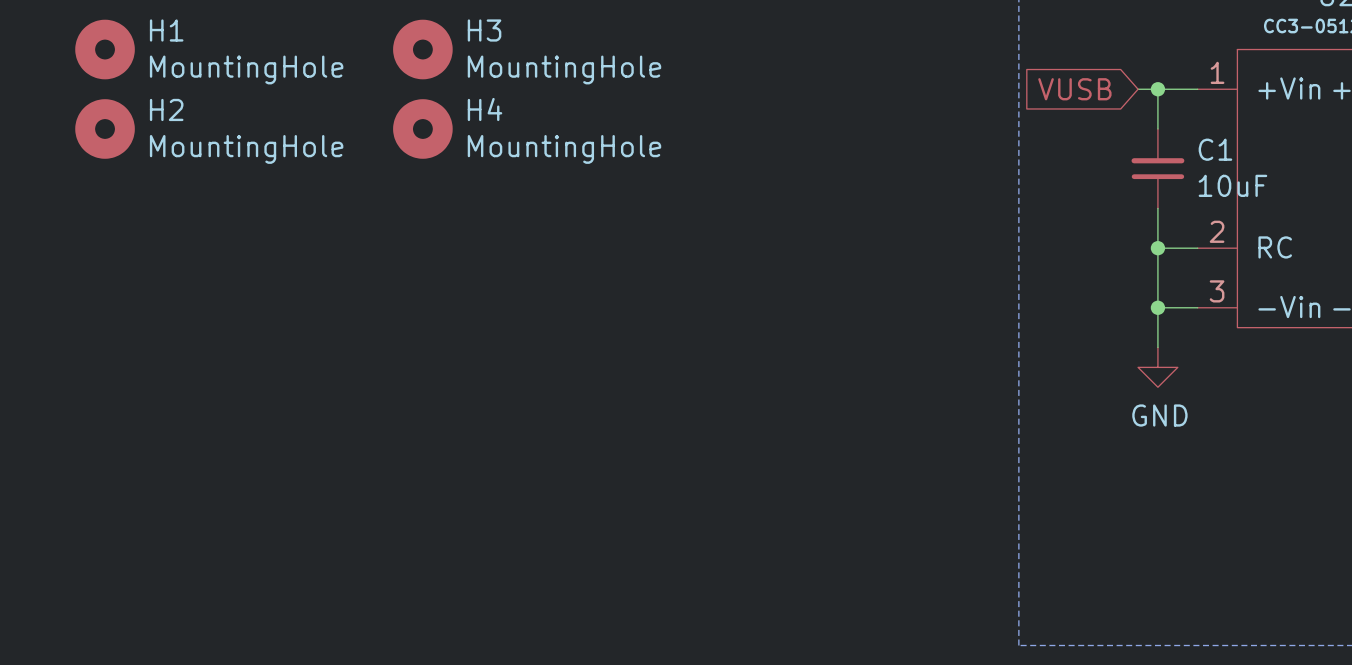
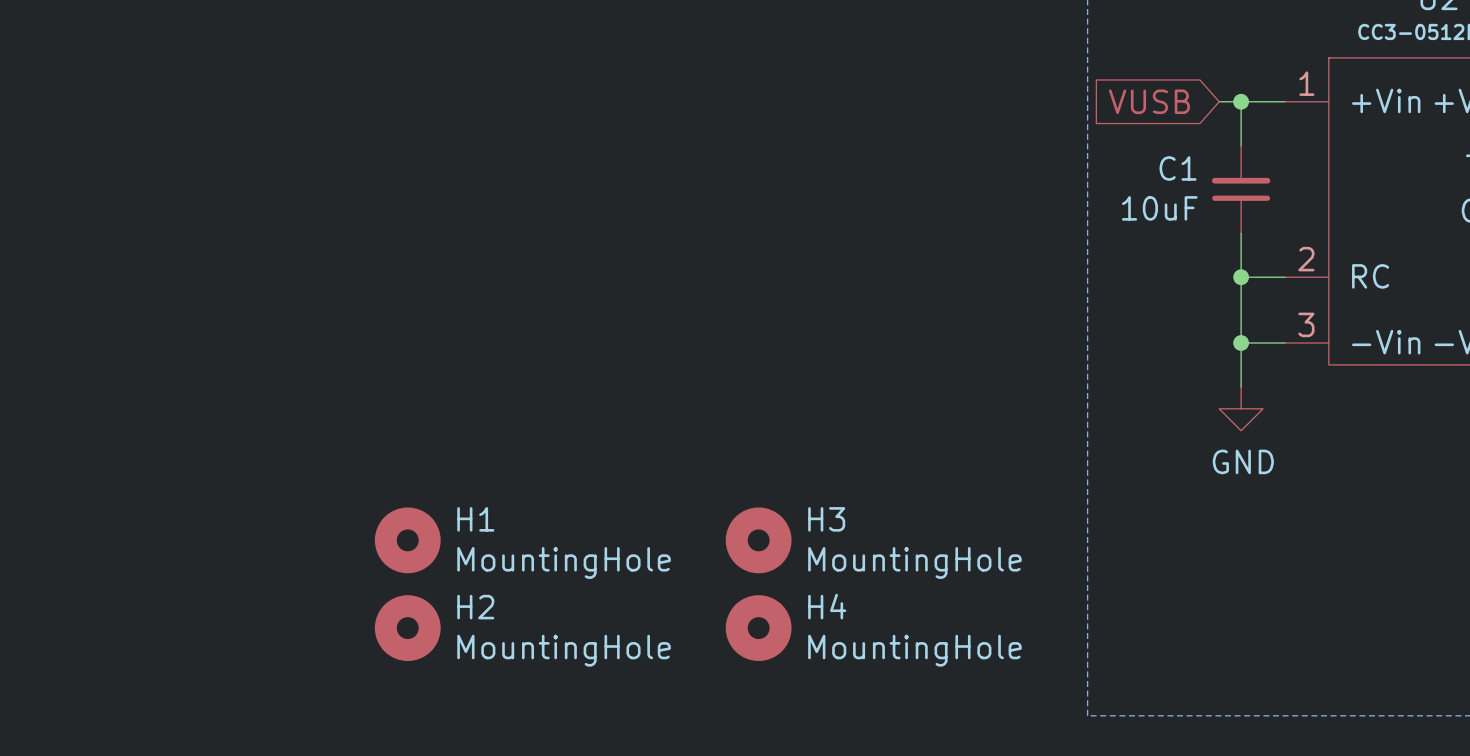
H1 position: (105, 49) -> (407, 540)
H3 position: (422, 49) -> (758, 540)
H2 position: (105, 128) -> (407, 628)
H4 position: (422, 128) -> (758, 628)
C1 name position: C1 (1215, 149) -> C1 (1178, 168)
C1 value position: 10uF (1232, 185) -> 10uF (1159, 208)

